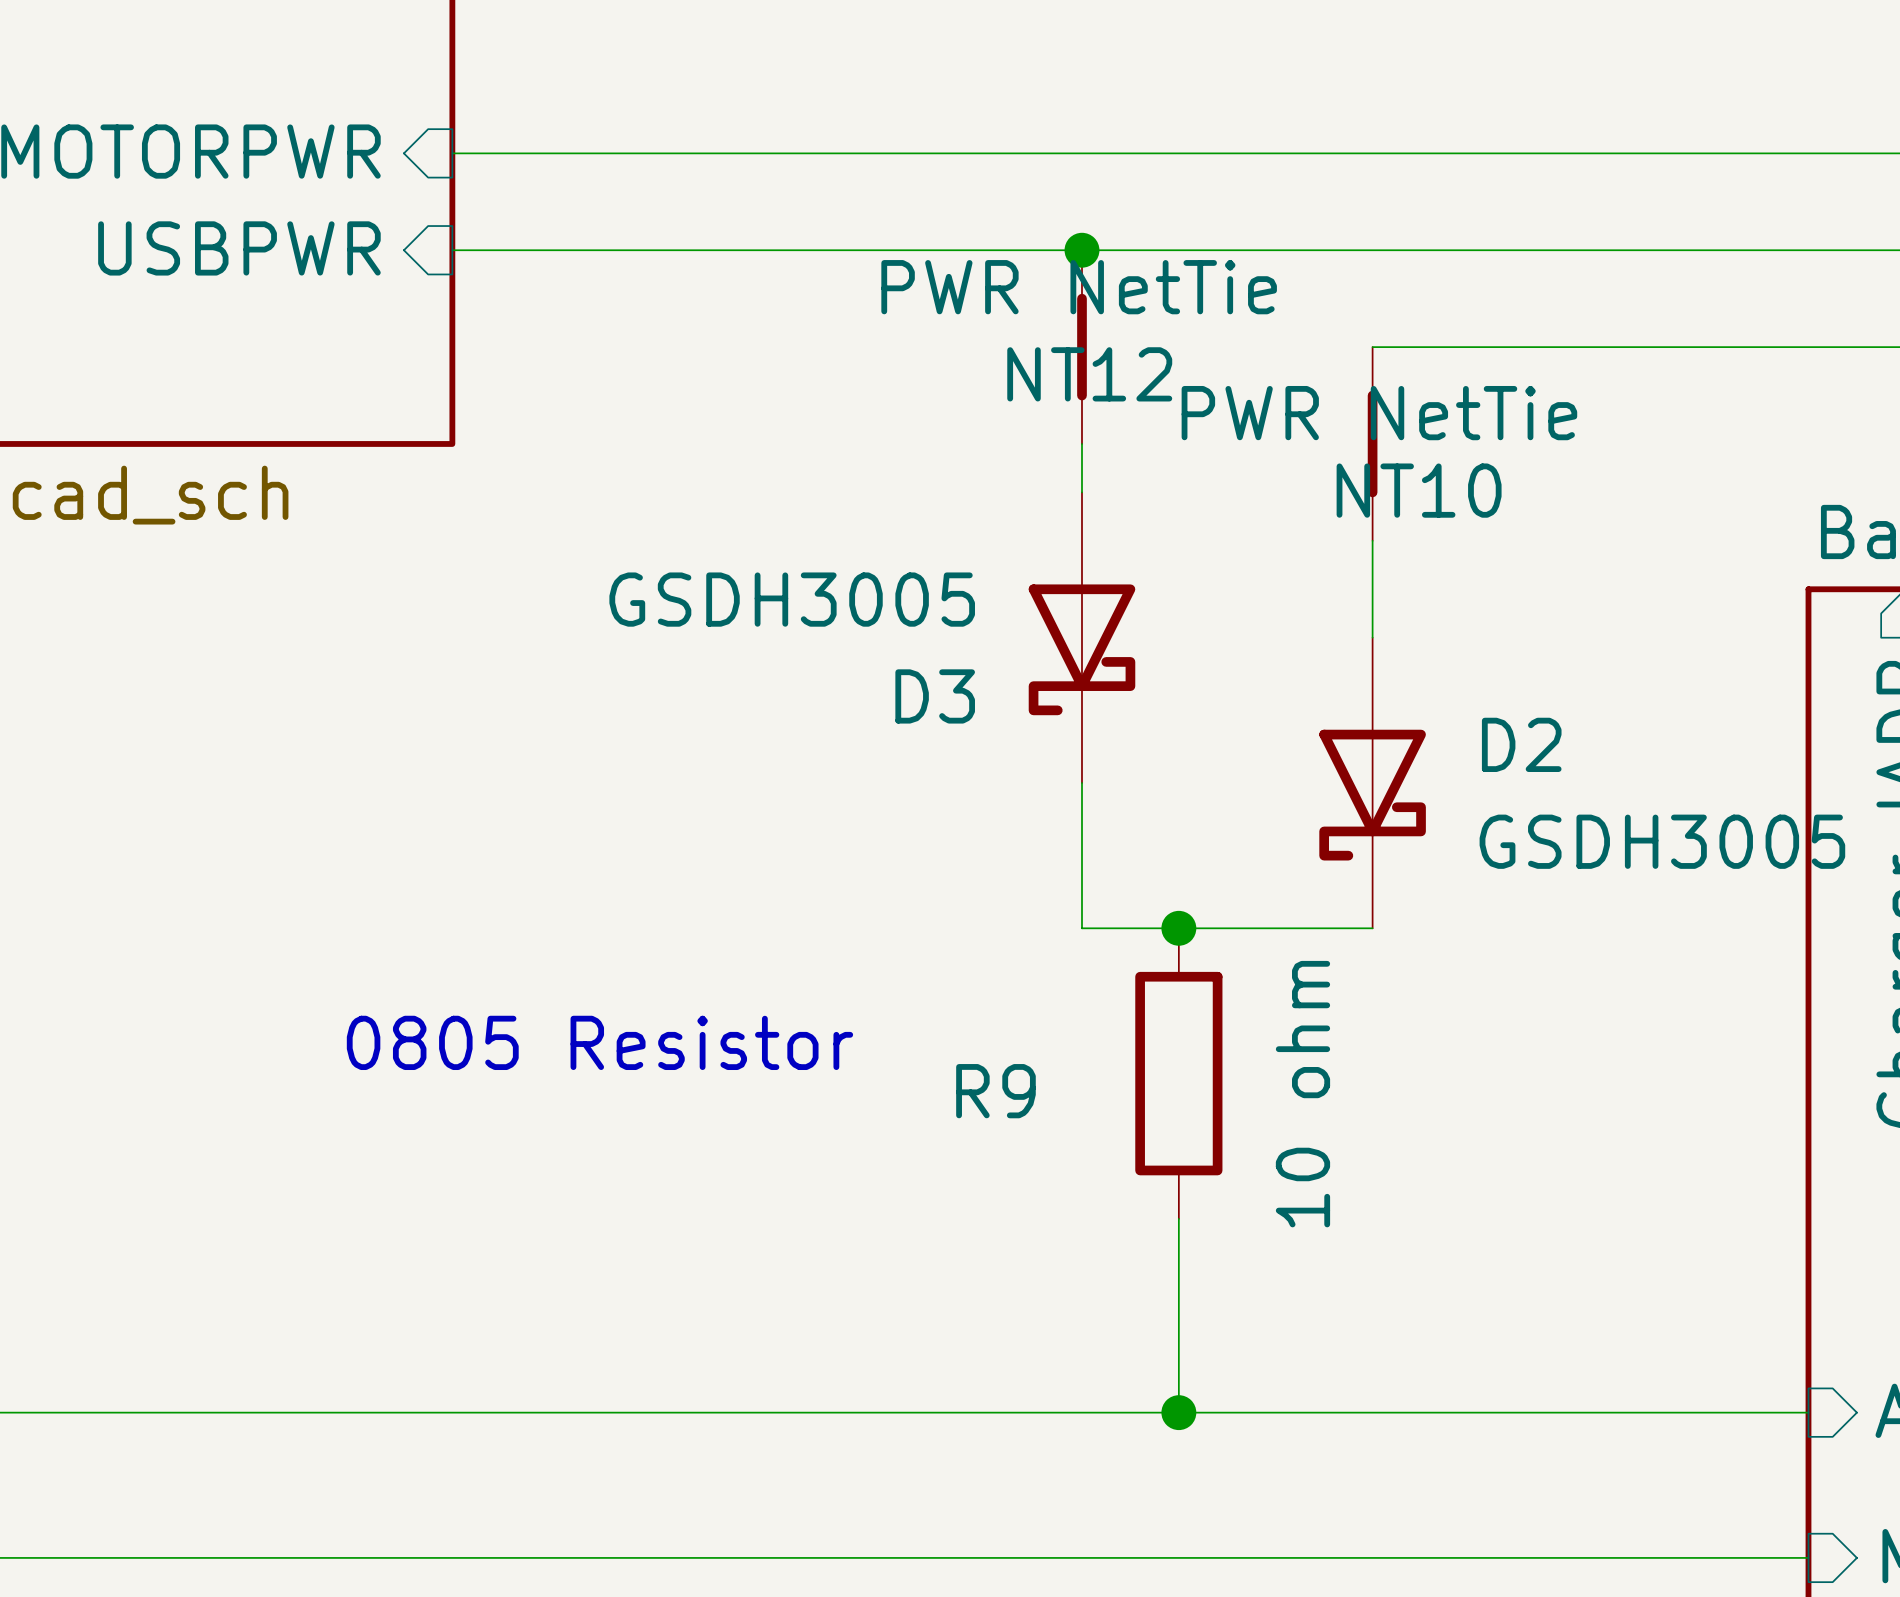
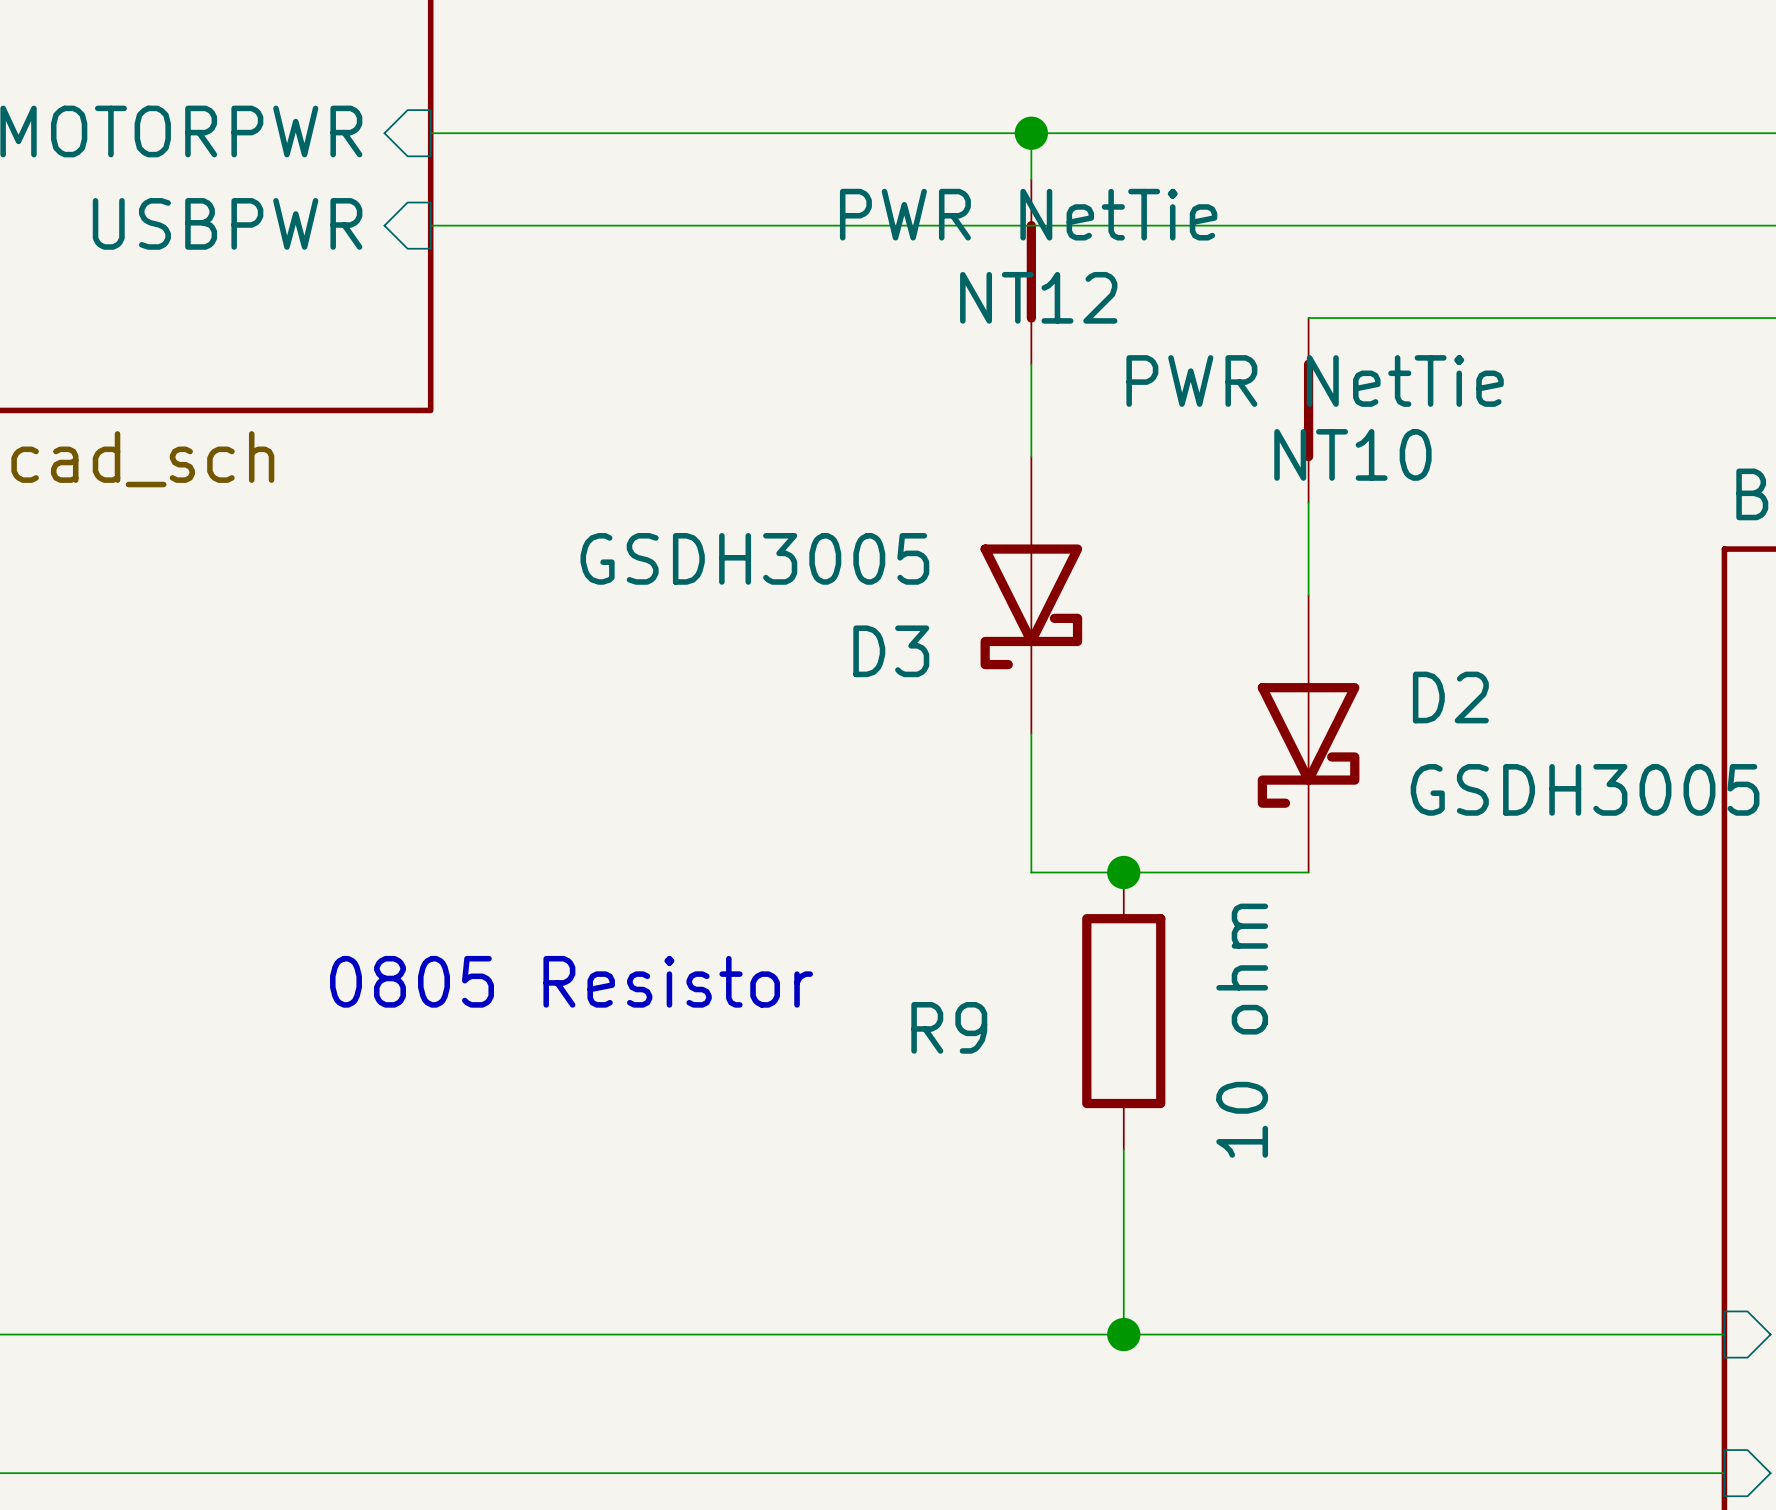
wire: none -> (1031, 133) (1031, 179)
junction position: (1081, 250) -> (1031, 133)
NT12 position: (1081, 347) -> (1031, 271)

